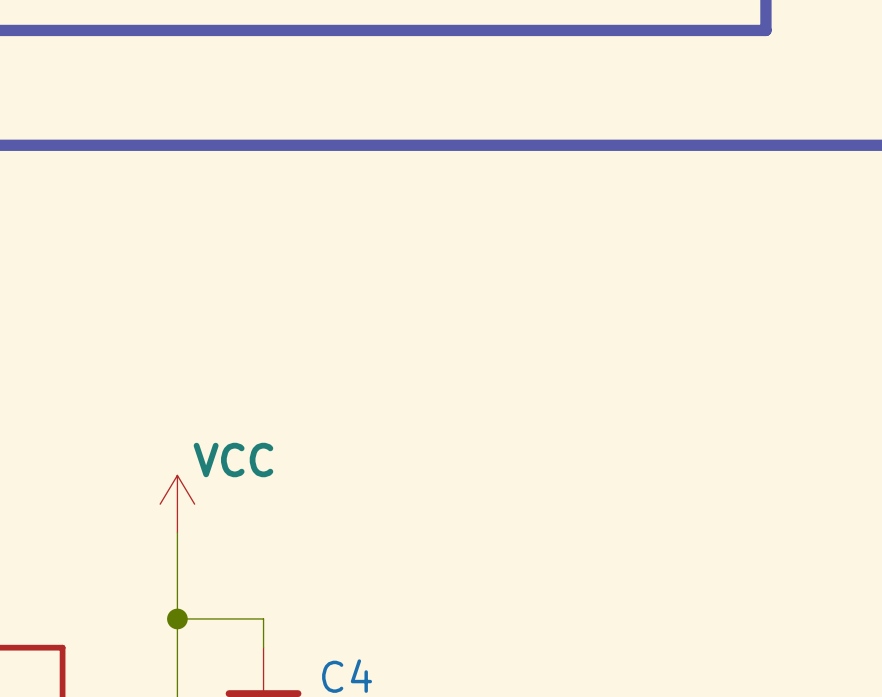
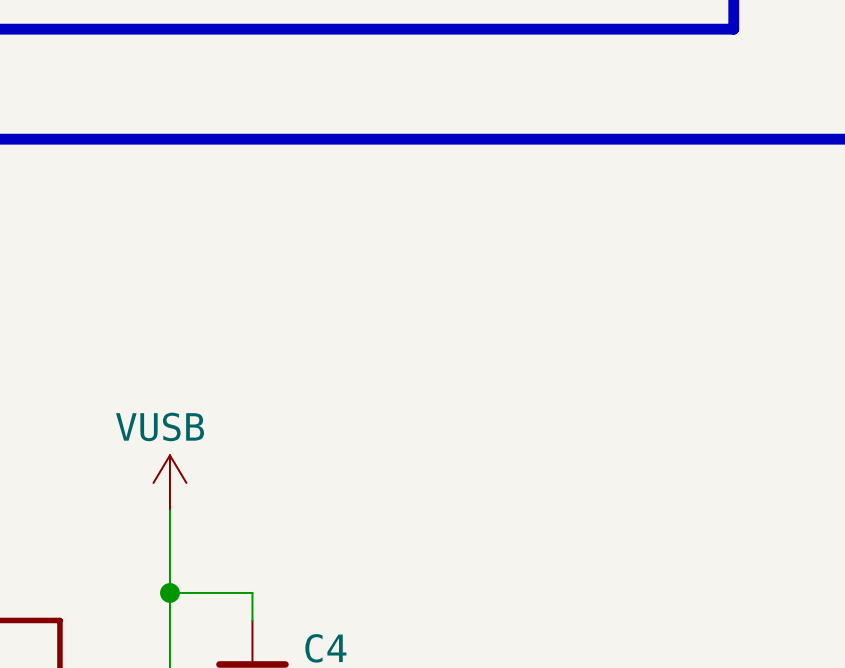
power symbol: VCC (177, 504) -> VUSB (169, 482)

